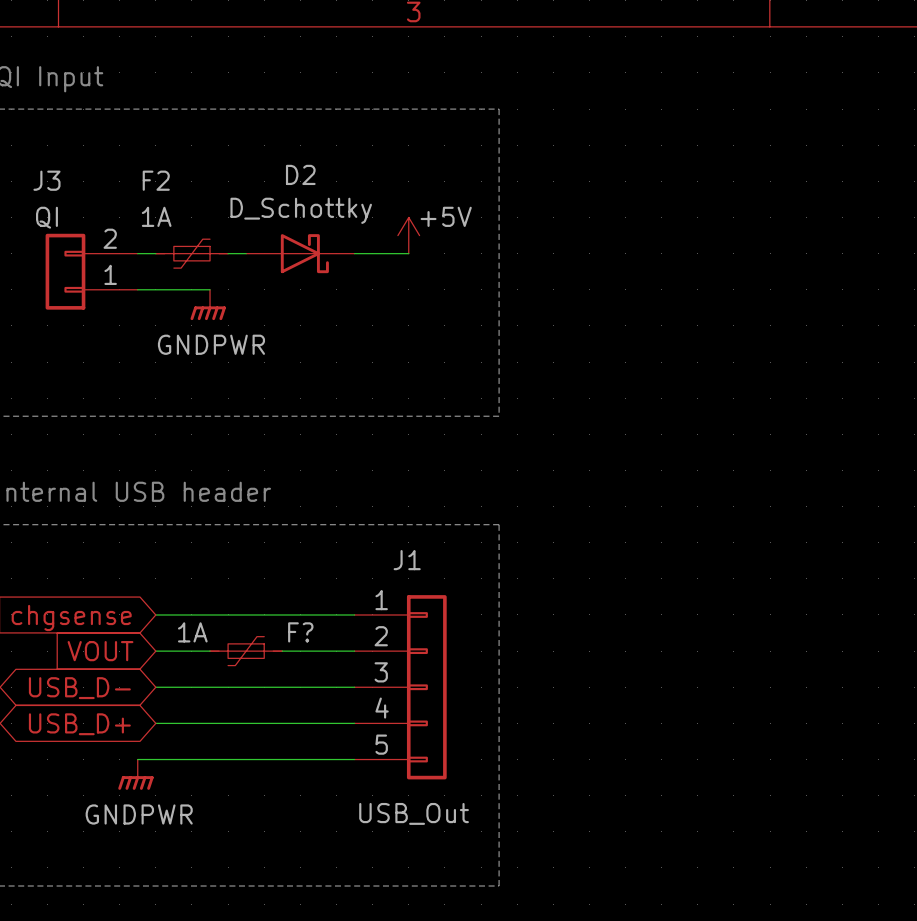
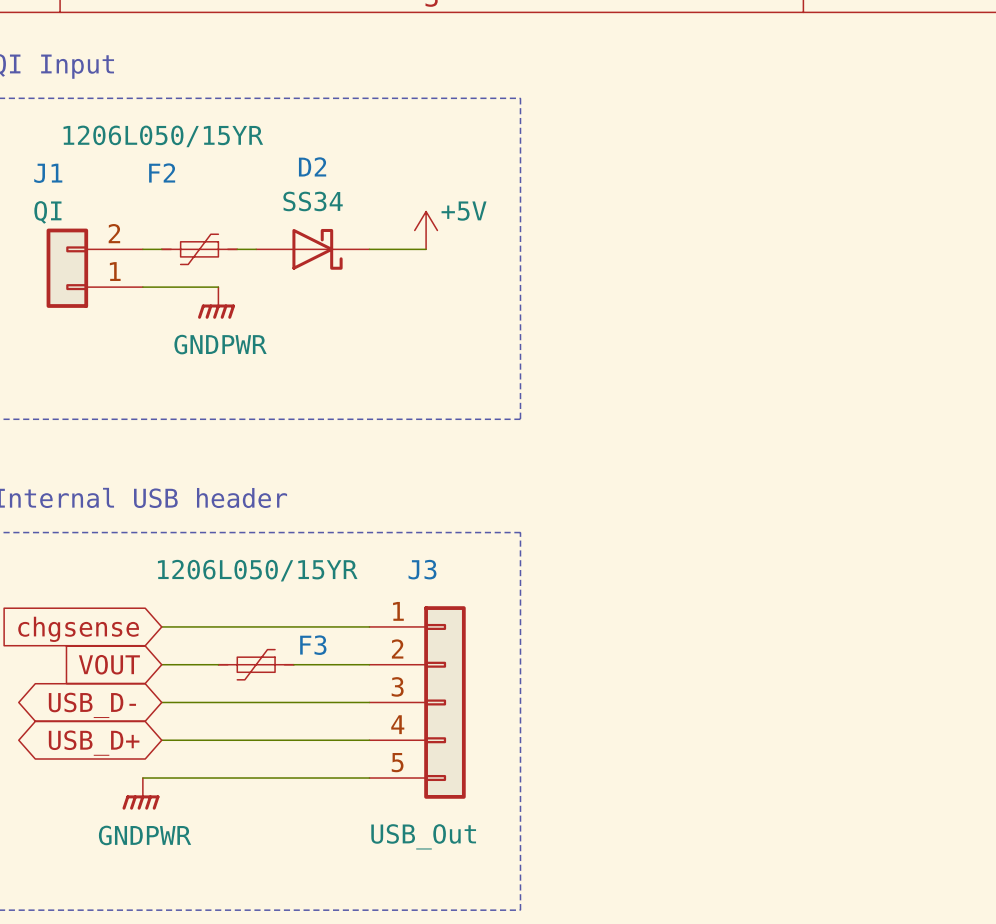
J3 name: J3 (46, 180) -> J1 (48, 173)
D2 value: D_Schottky (301, 210) -> SS34 (313, 201)
F2 value: 1A (156, 216) -> 1206L050/15YR (163, 136)
J1 name: J1 (407, 560) -> J3 (422, 569)
F? value: 1A (192, 632) -> 1206L050/15YR (257, 570)
F? name: F? (300, 632) -> F3 (313, 645)

